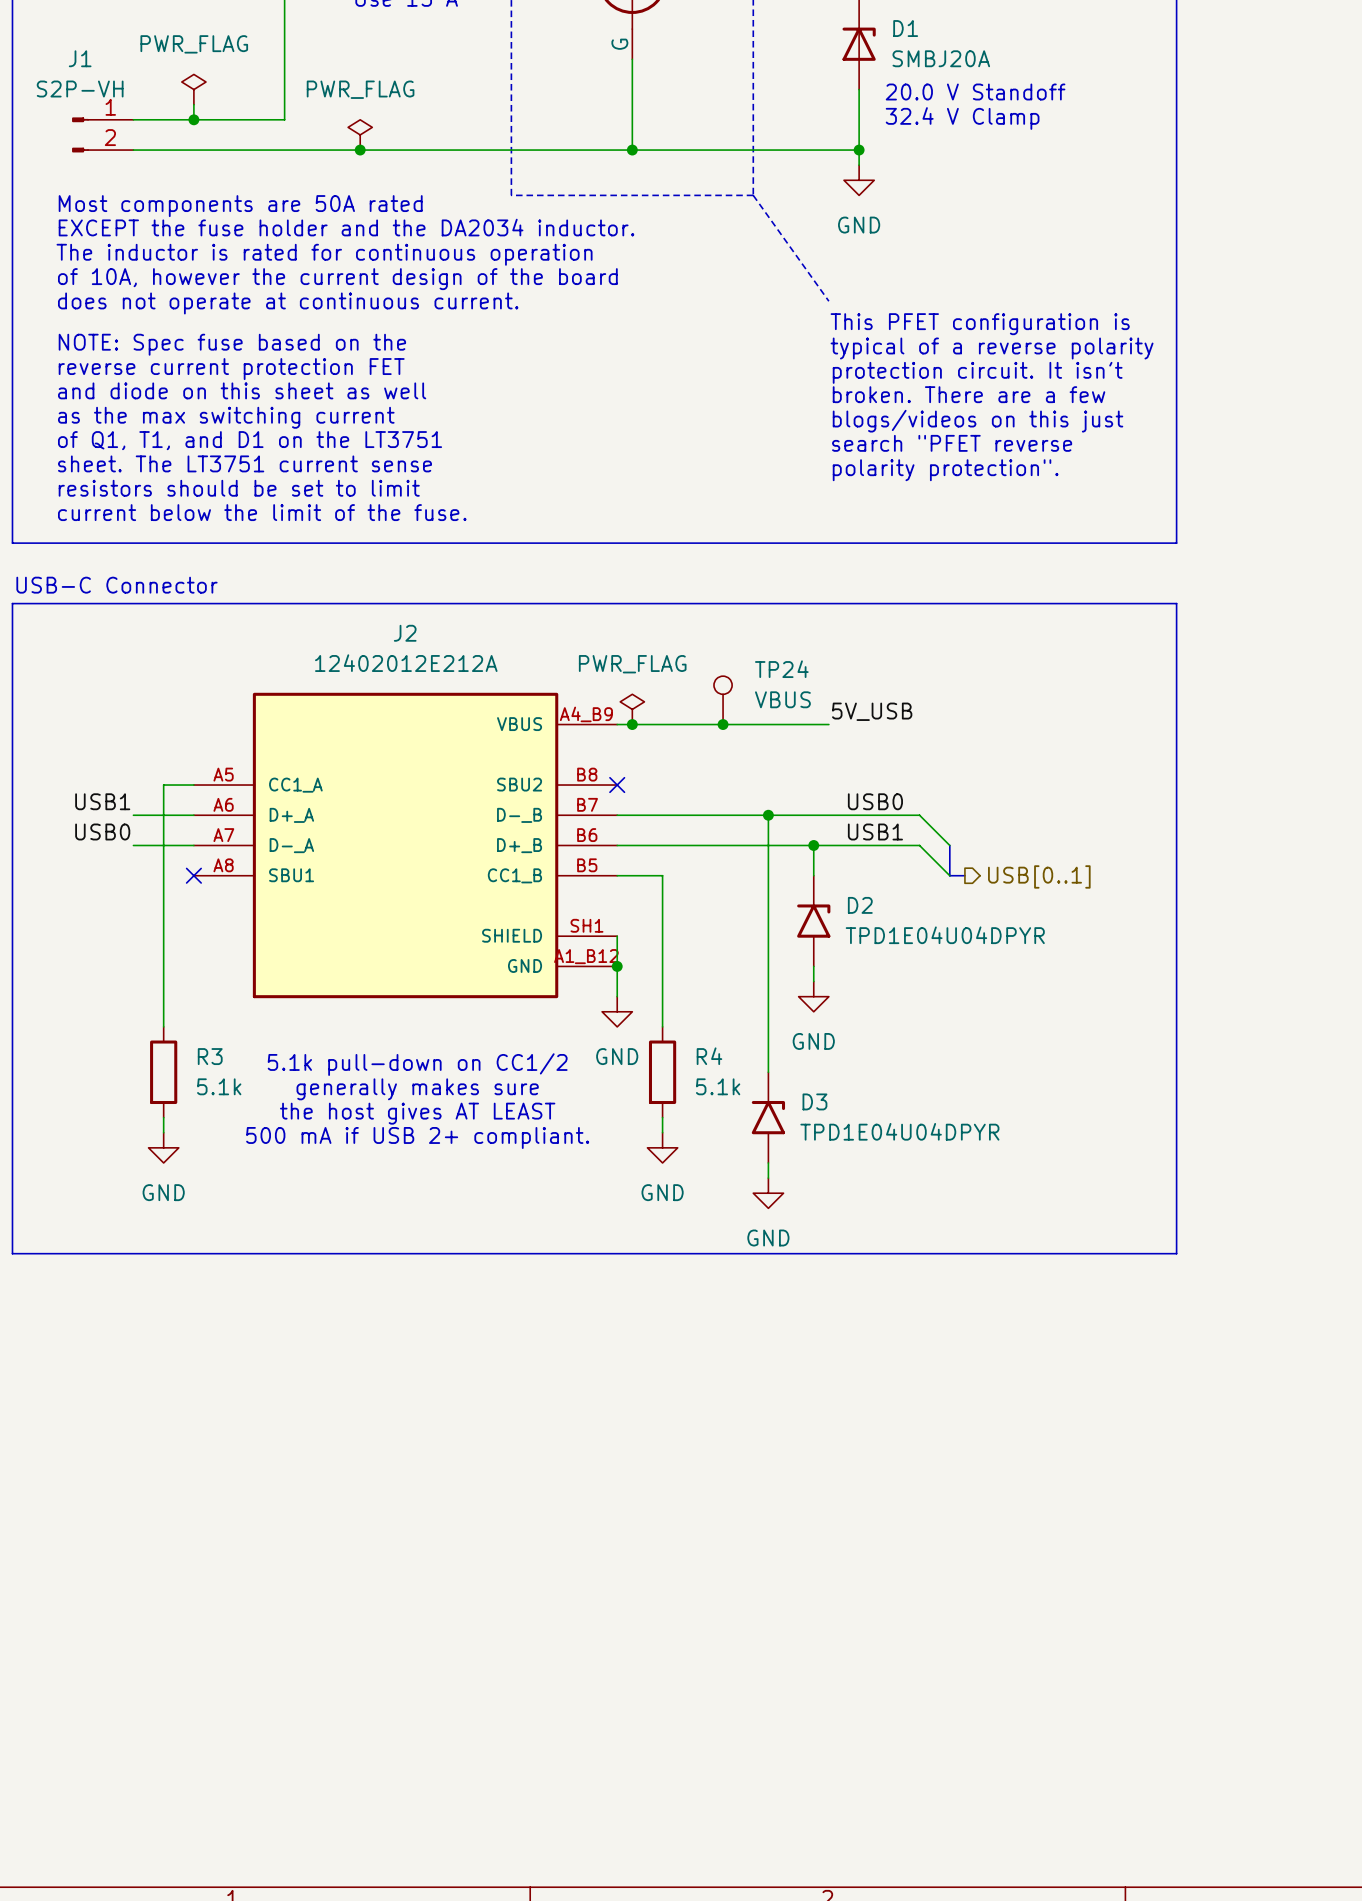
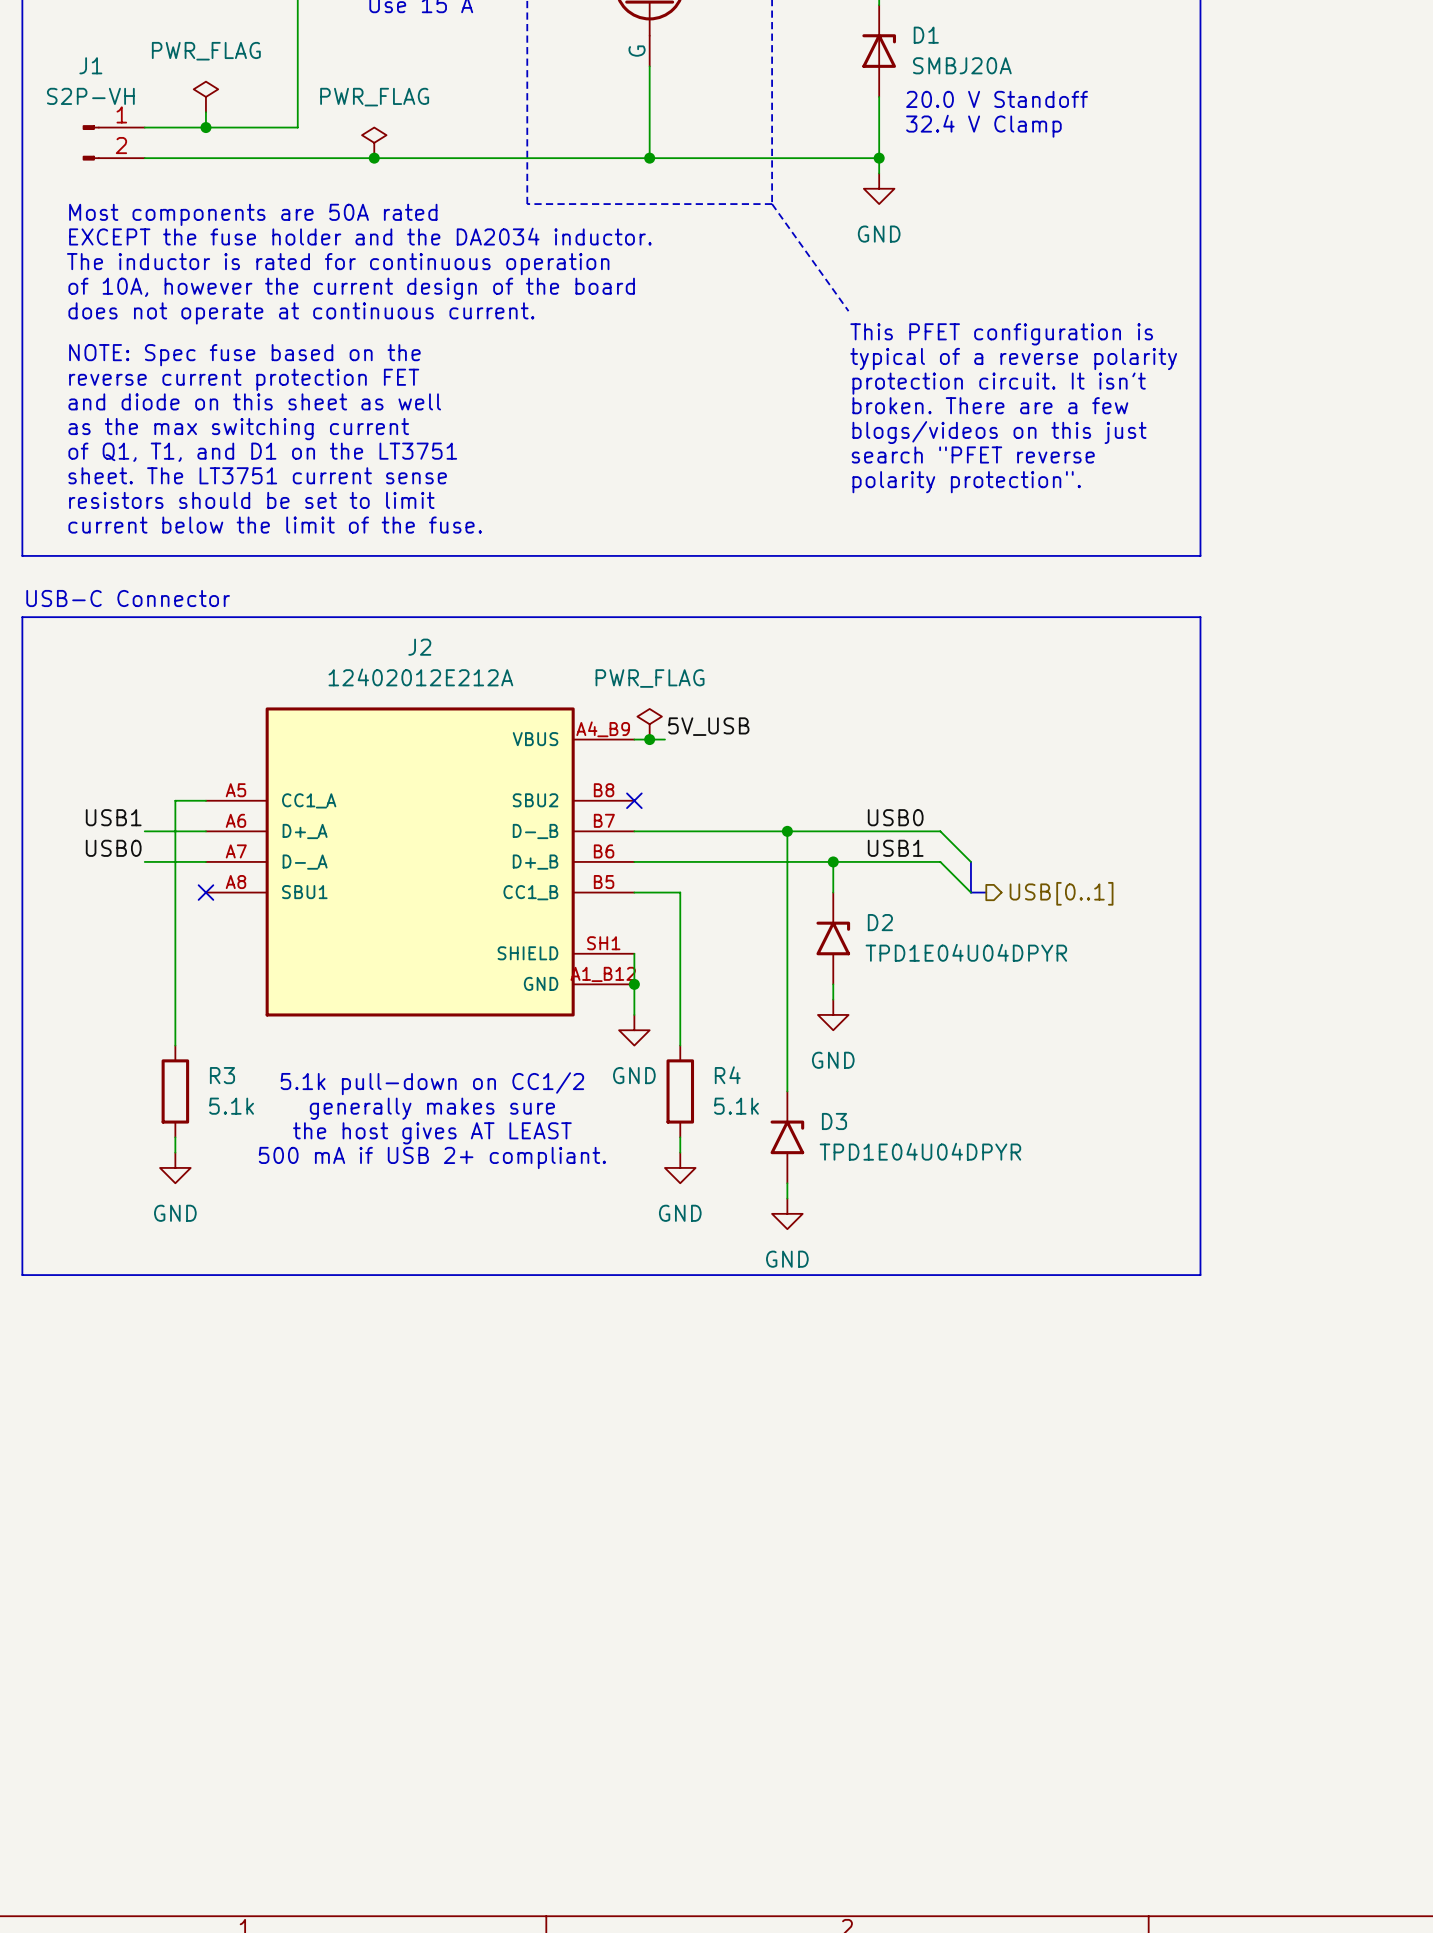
TP24: VBUS (723, 700) -> none
label position: 5V_USB (872, 711) -> 5V_USB (708, 726)
wire: (647, 724) (828, 724) -> none
junction: (723, 724) -> none

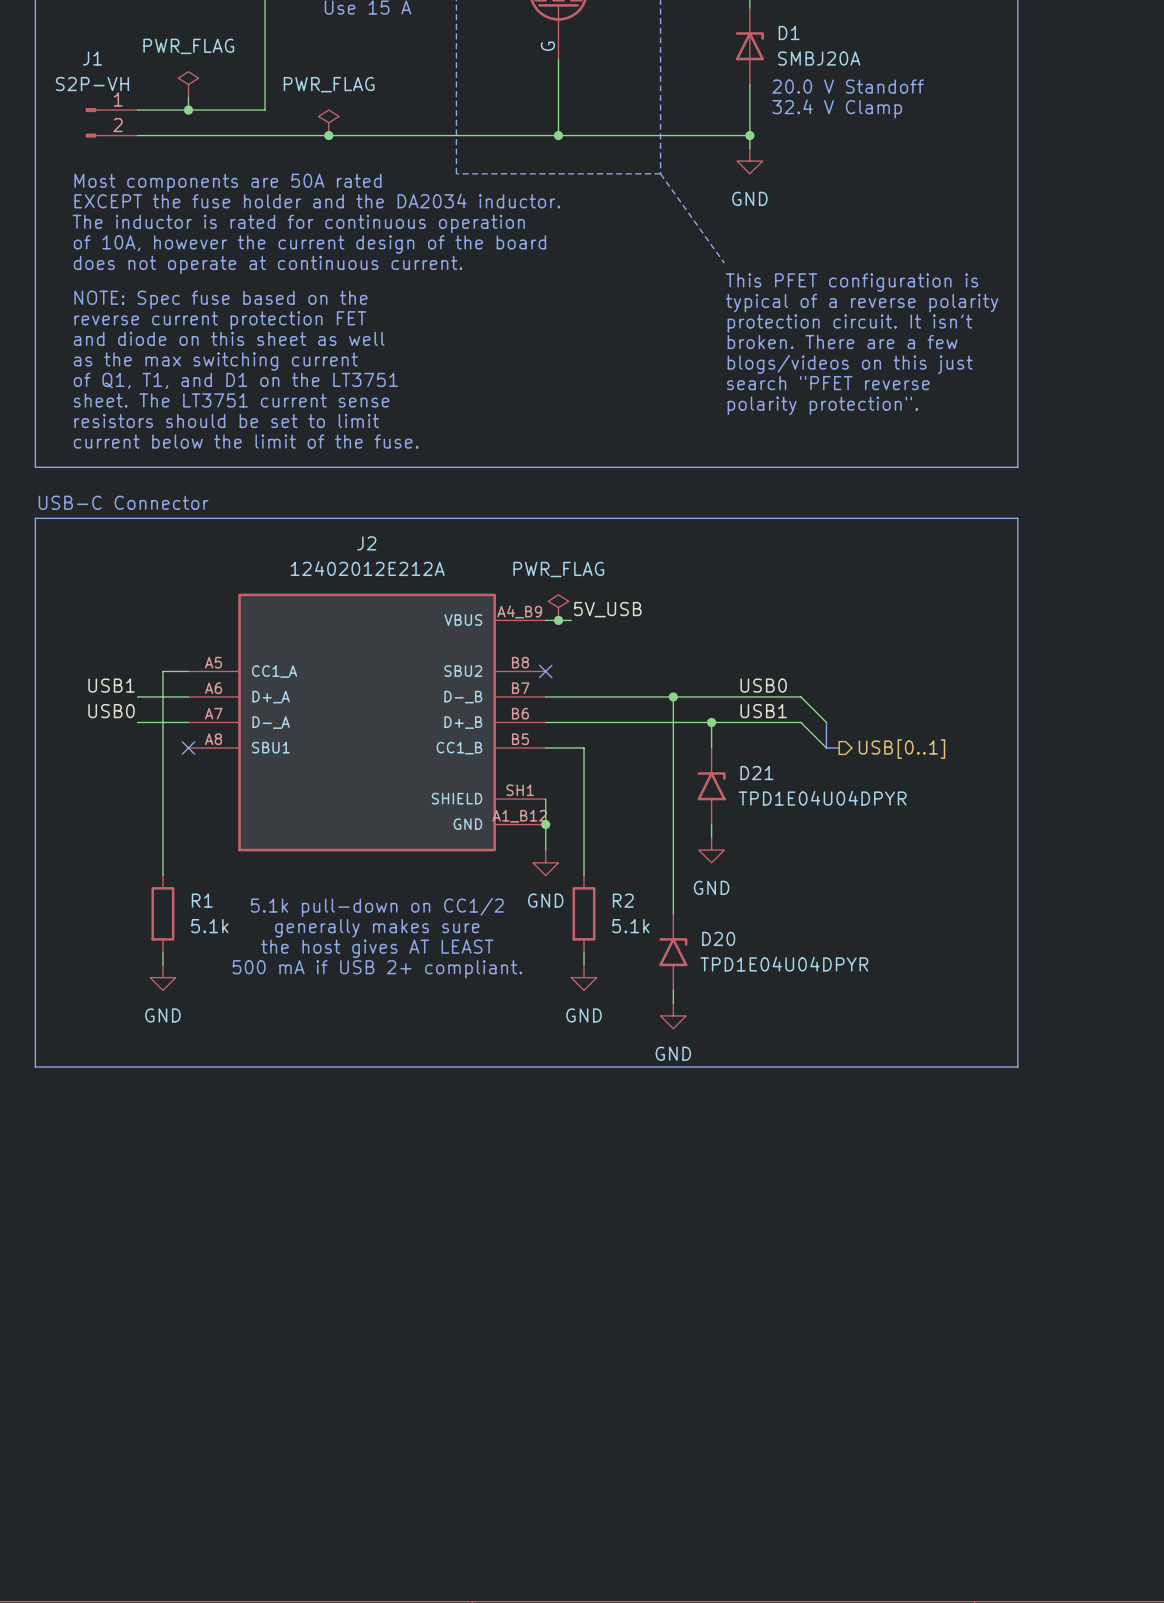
D2 name: D2 (880, 922) -> D21 (756, 773)
R3 name: R3 (222, 1075) -> R1 (202, 900)
R4 name: R4 (727, 1075) -> R2 (623, 900)
D3 name: D3 (834, 1121) -> D20 (718, 938)

